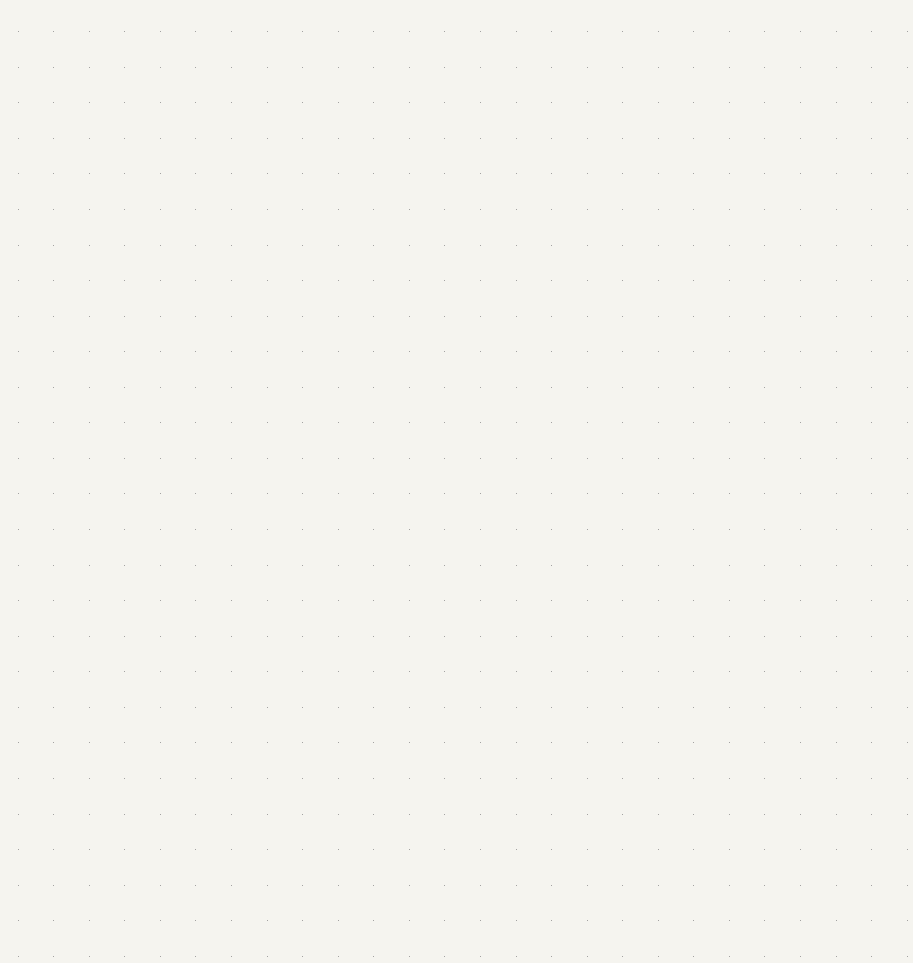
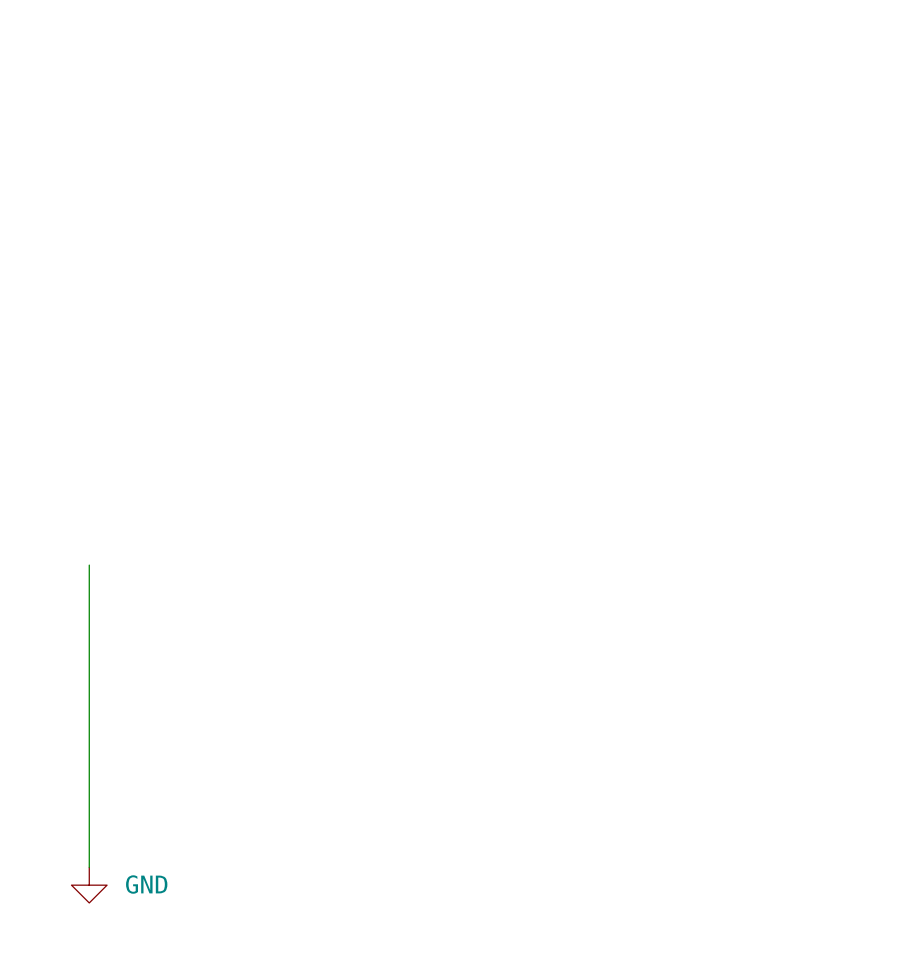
wire: none -> (89, 565) (89, 867)
power symbol: none -> GND (89, 885)

